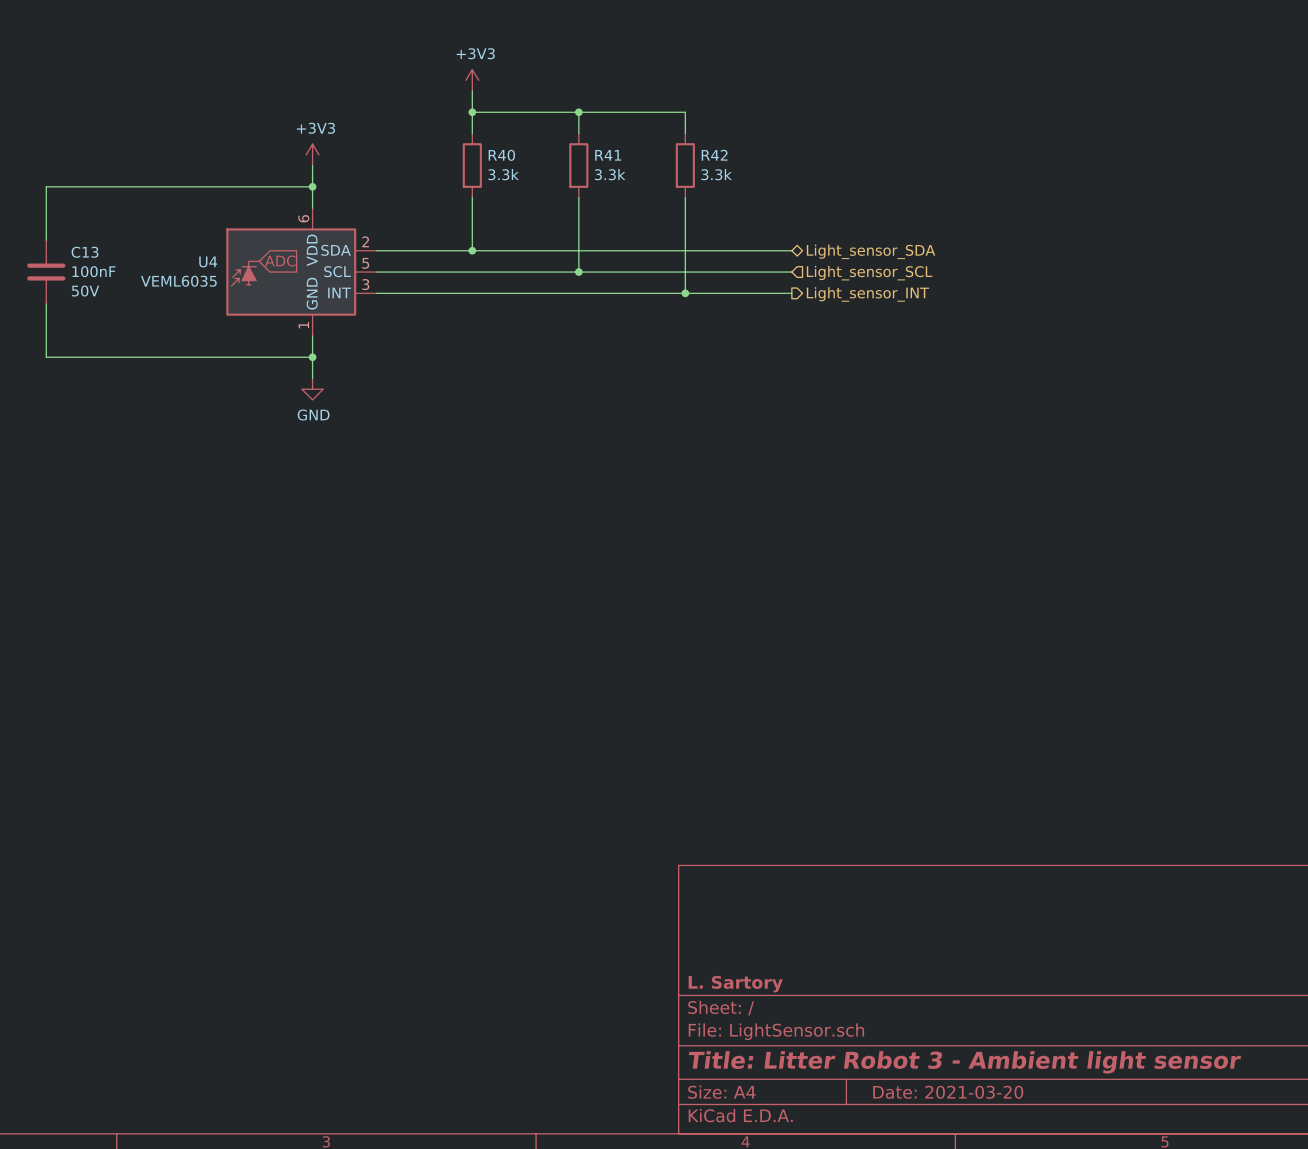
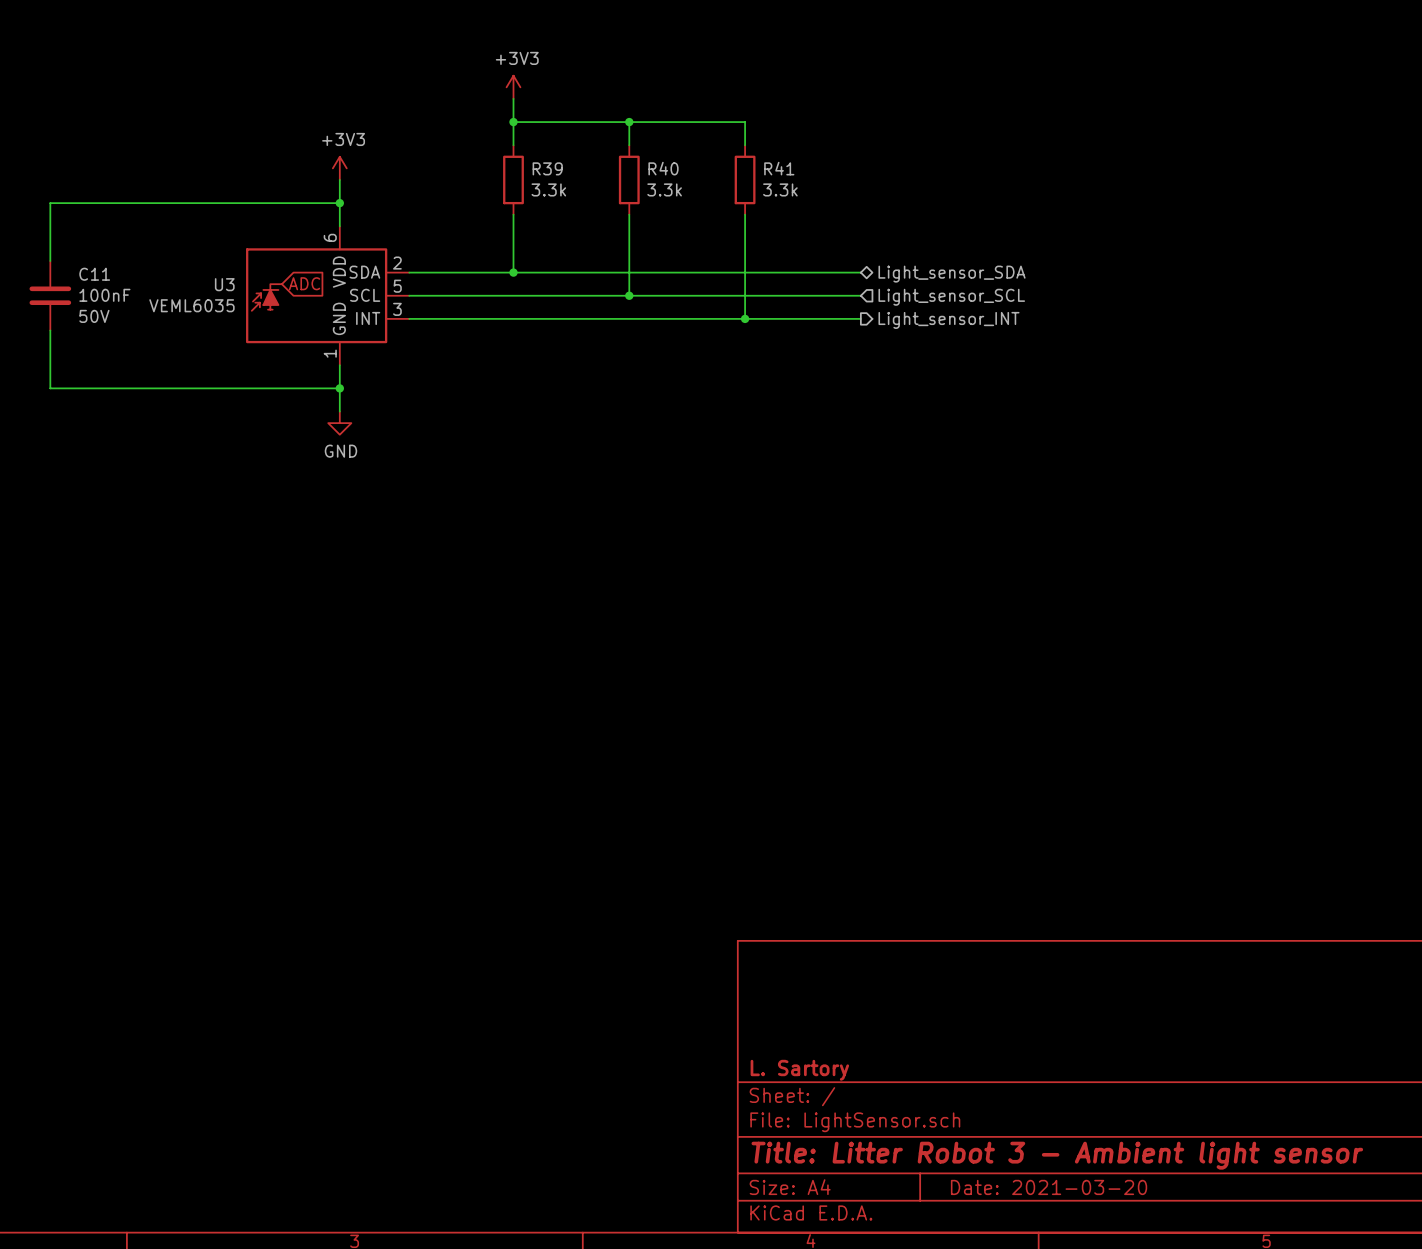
R40 name: R40 (501, 155) -> R39 (547, 168)
R41 name: R41 (608, 155) -> R40 (663, 168)
R42 name: R42 (714, 155) -> R41 (779, 168)
C13 name: C13 (85, 252) -> C11 (94, 274)
U4 name: U4 (208, 261) -> U3 (224, 284)

